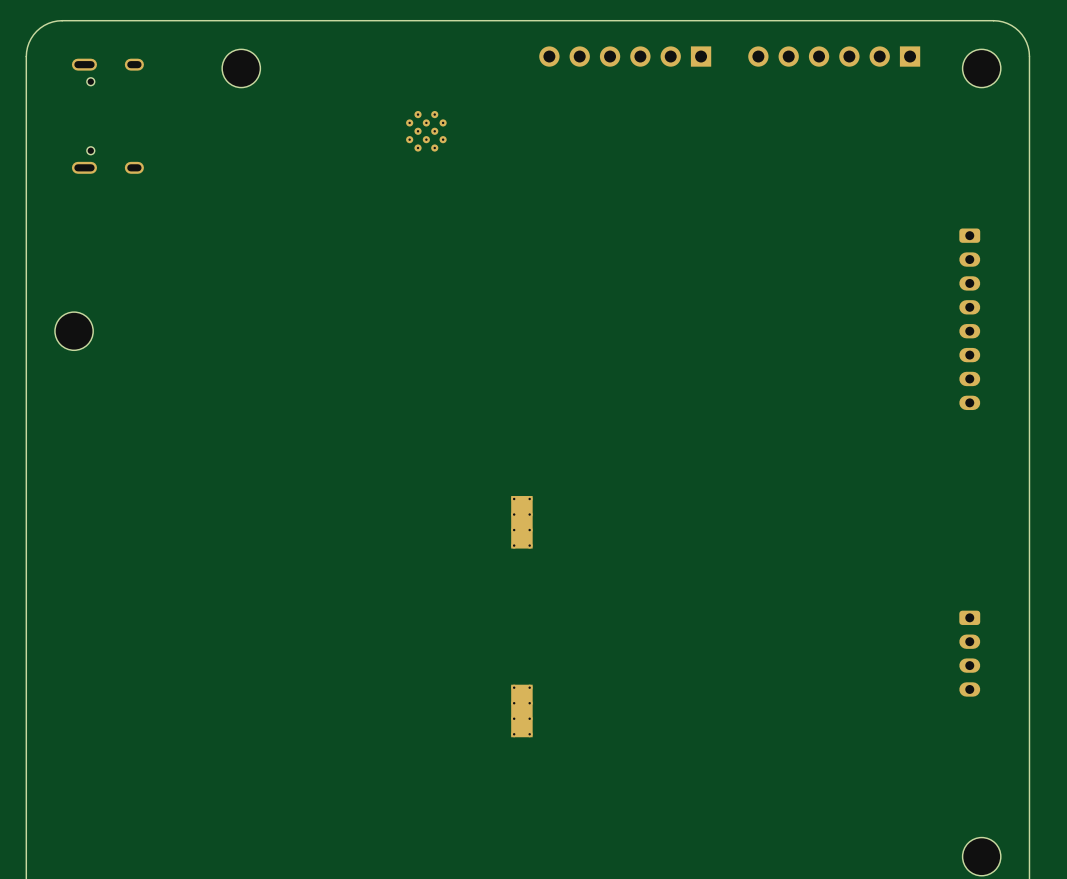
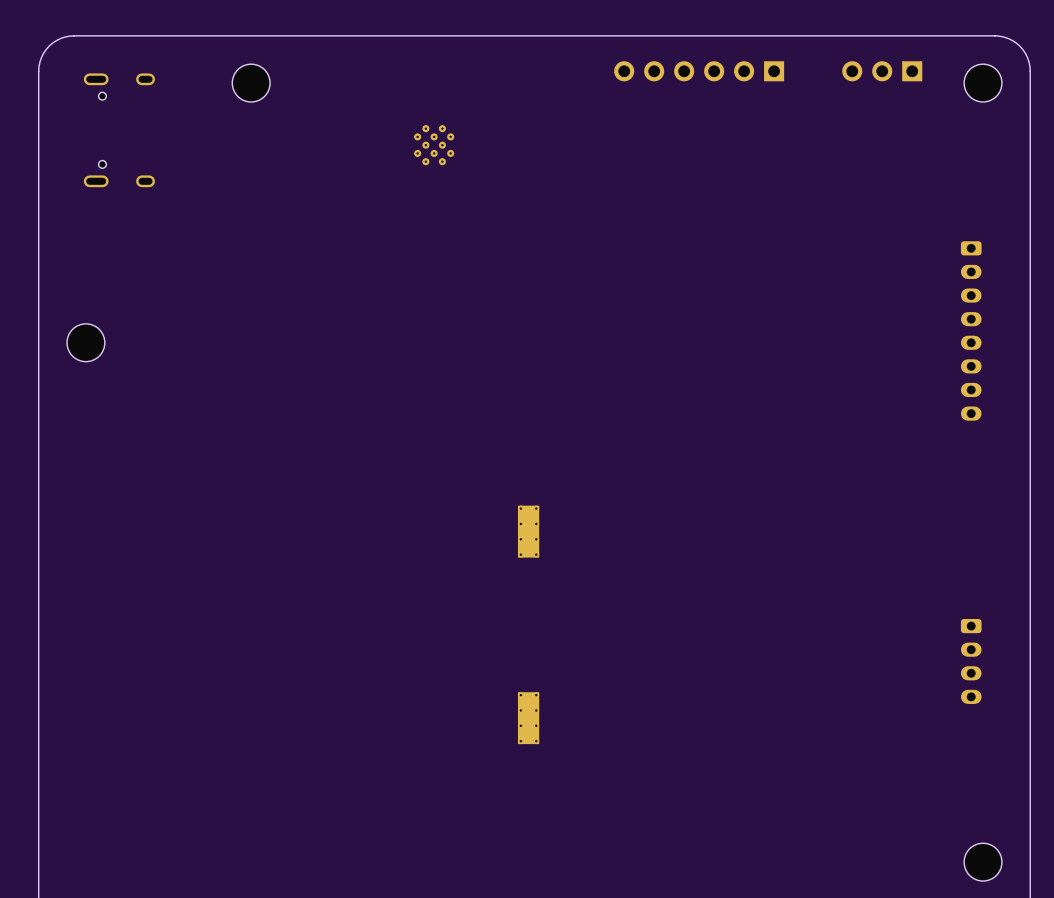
part position: (625, 56) -> (699, 71)
part: (834, 56) -> none

